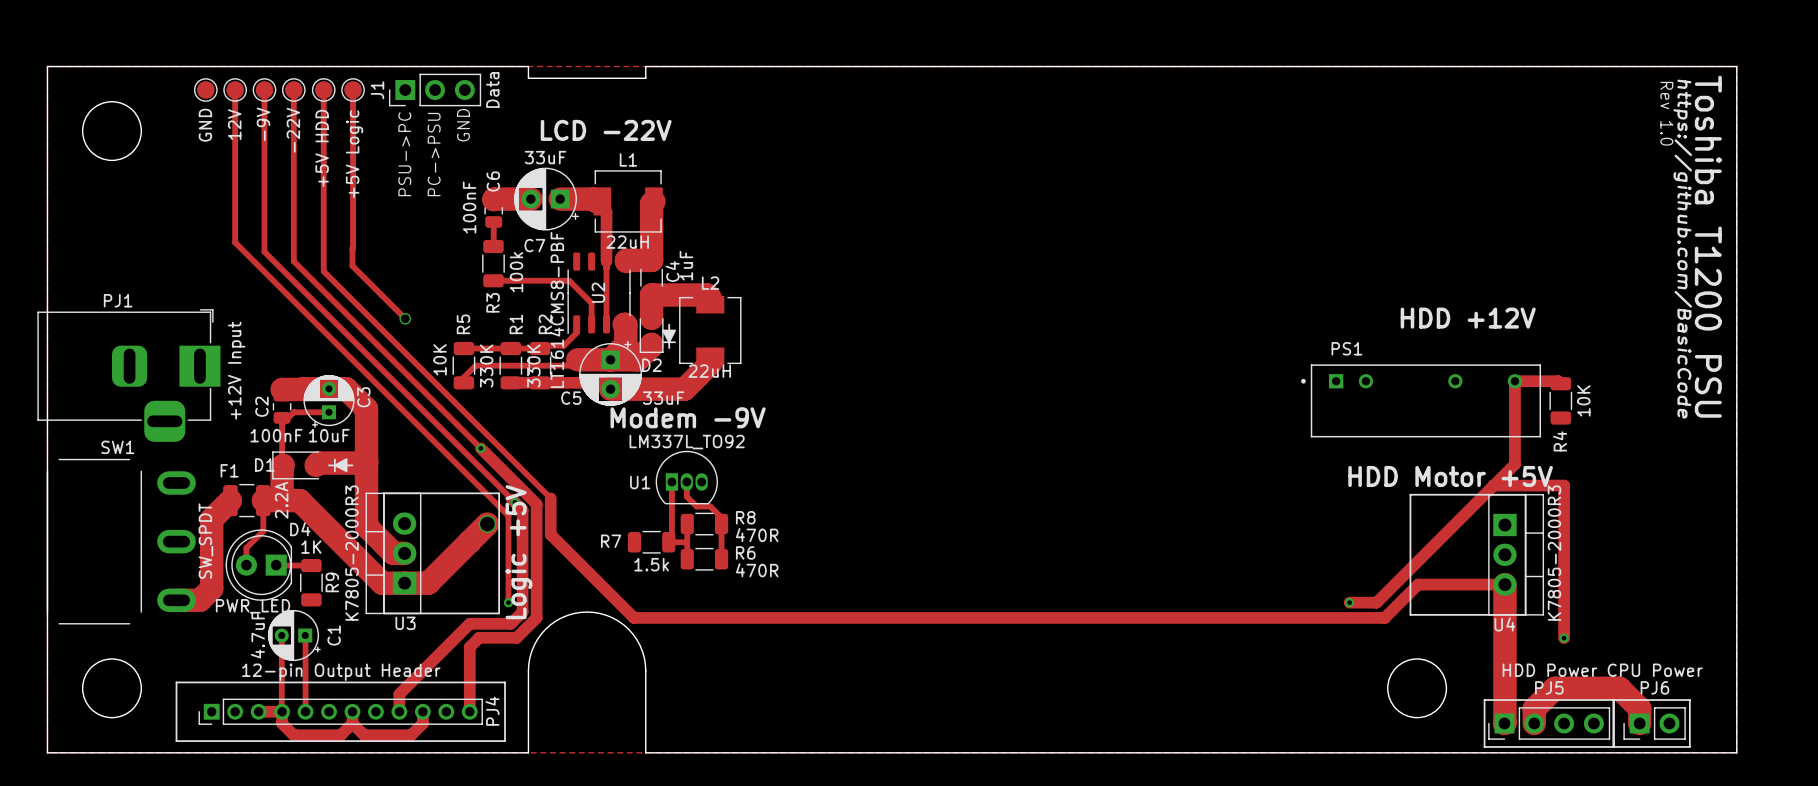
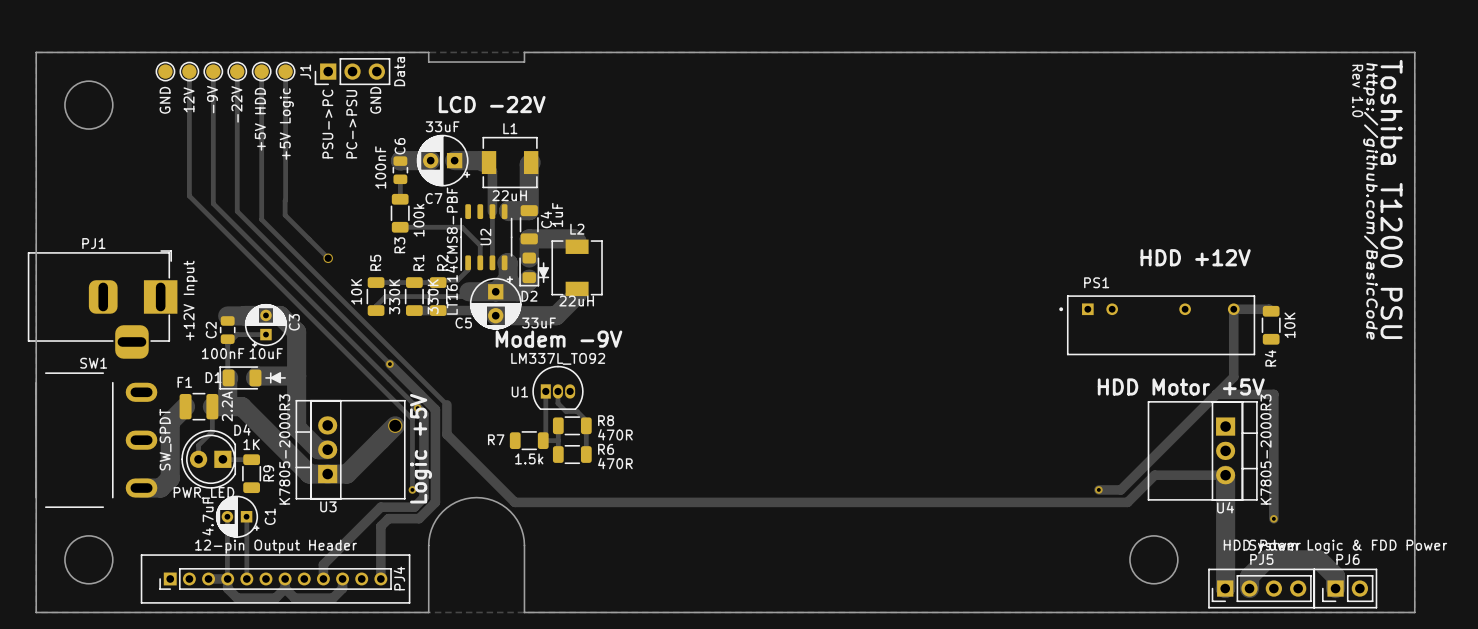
PJ6 value: CPU Power (1655, 670) -> System Logic & FDD Power (1348, 546)

